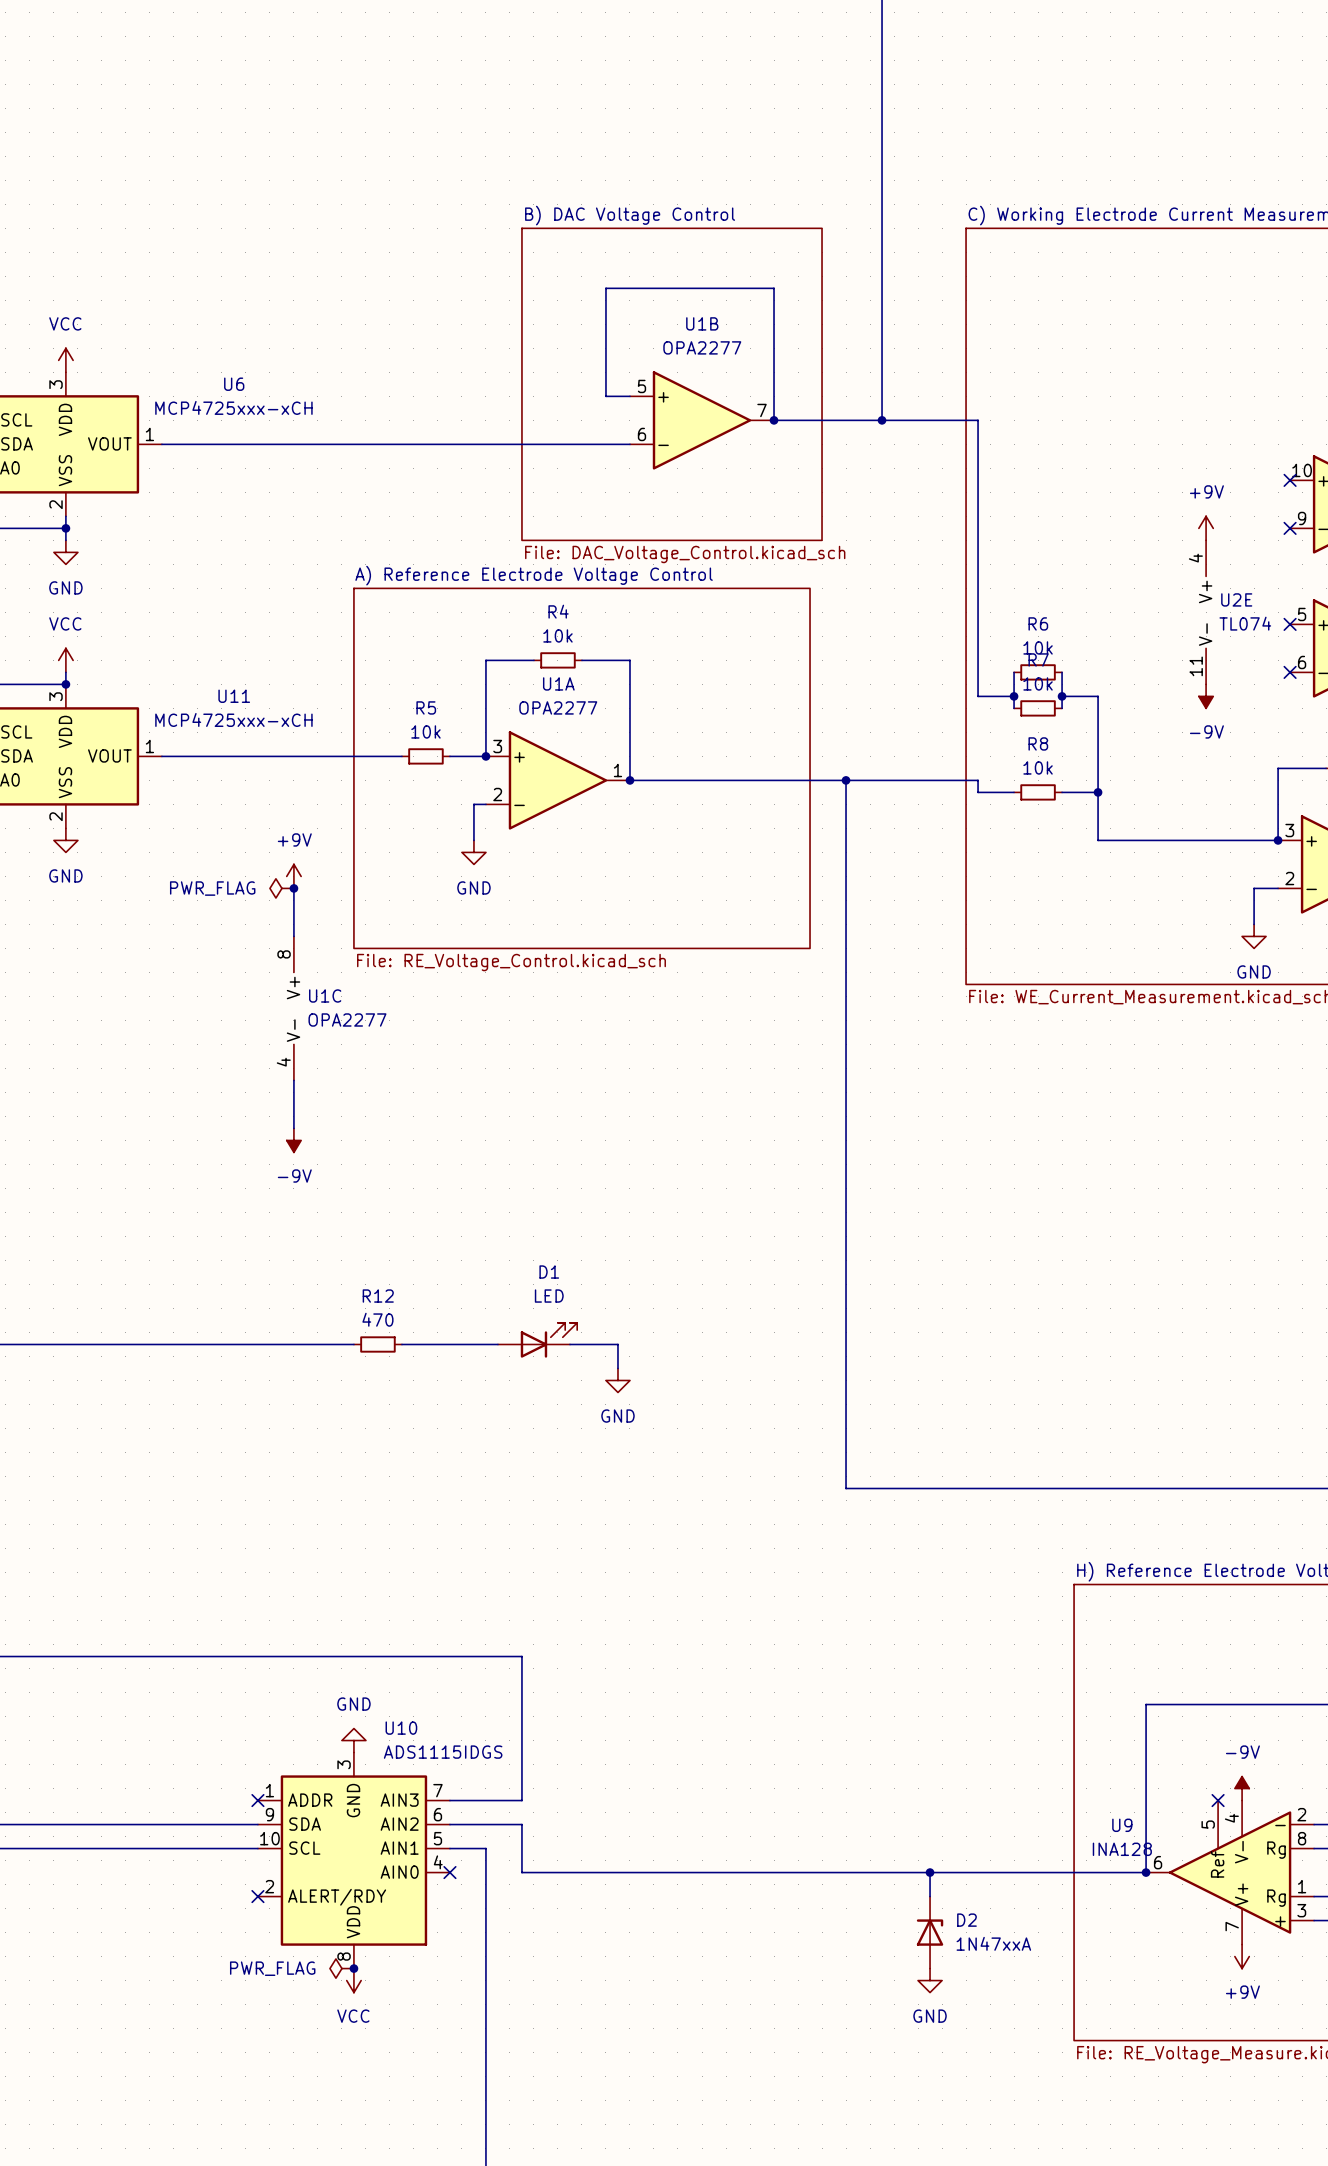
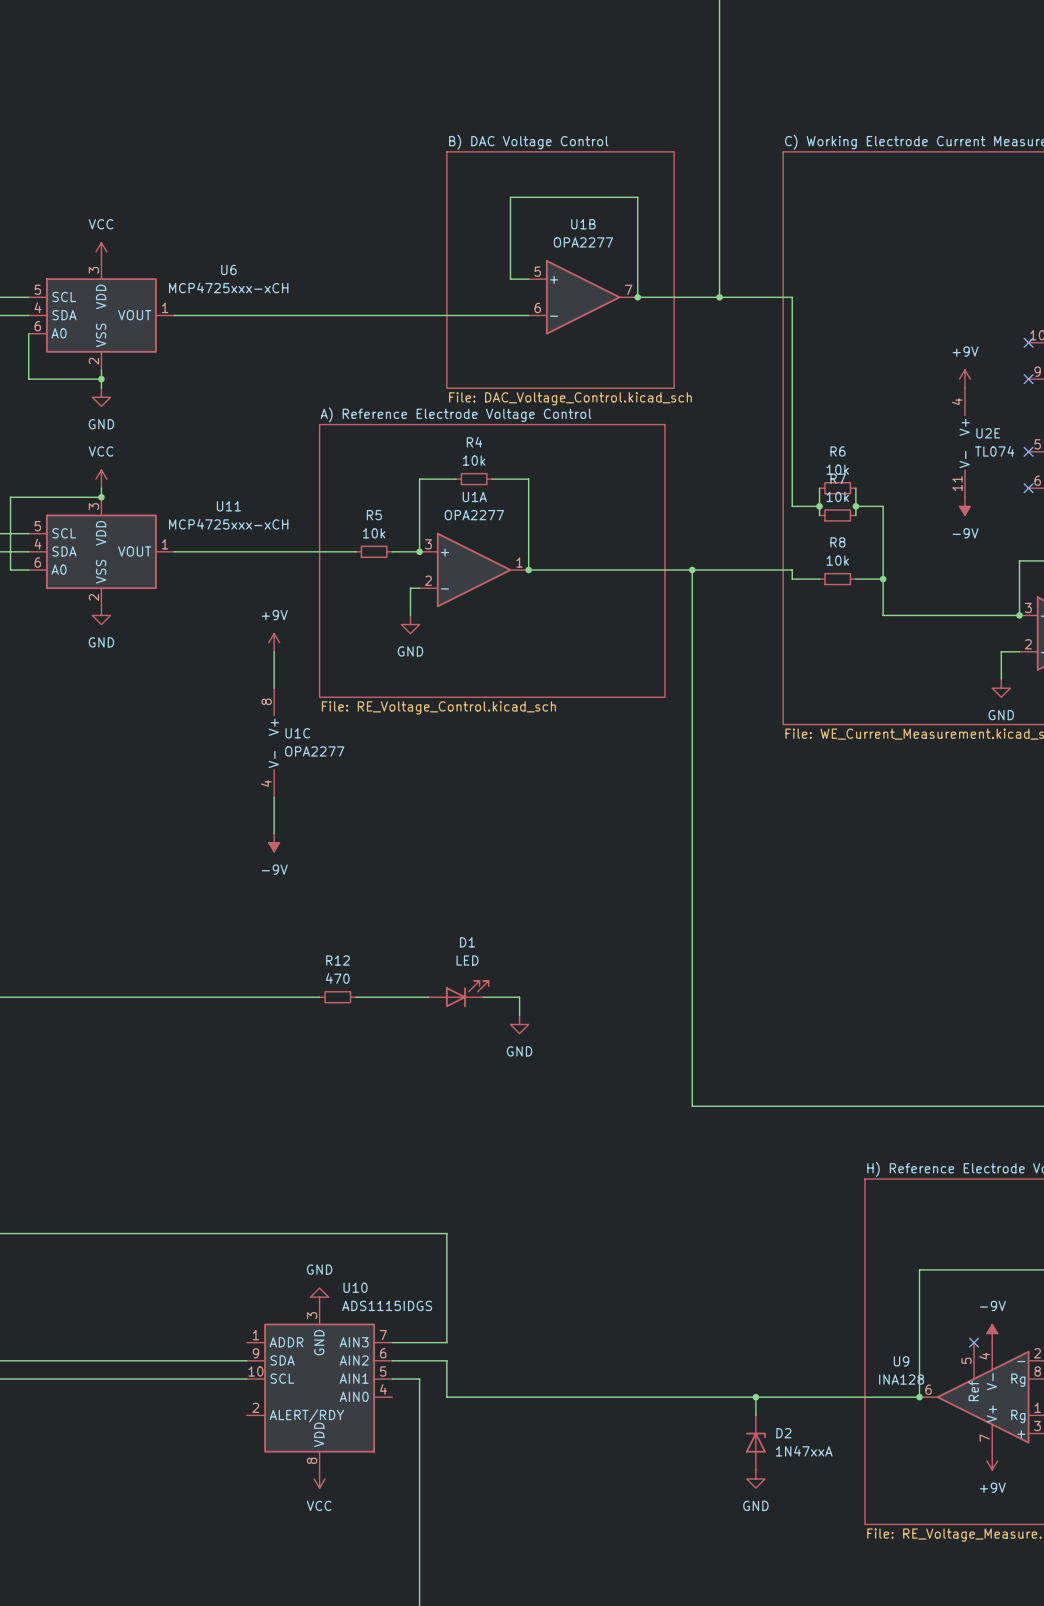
power symbol: PWR_FLAG (281, 888) -> none
junction: (293, 888) -> none
no-connect mark: (257, 1800) -> none
no-connect mark: (449, 1872) -> none
no-connect mark: (257, 1896) -> none
power symbol: PWR_FLAG (341, 1968) -> none
junction: (353, 1968) -> none

